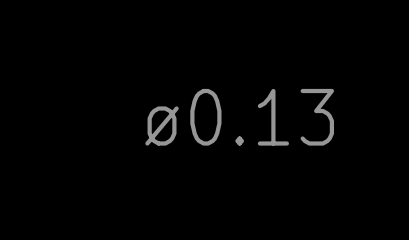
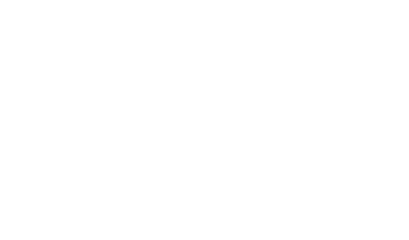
text: ø0.13 (239, 117) -> none

